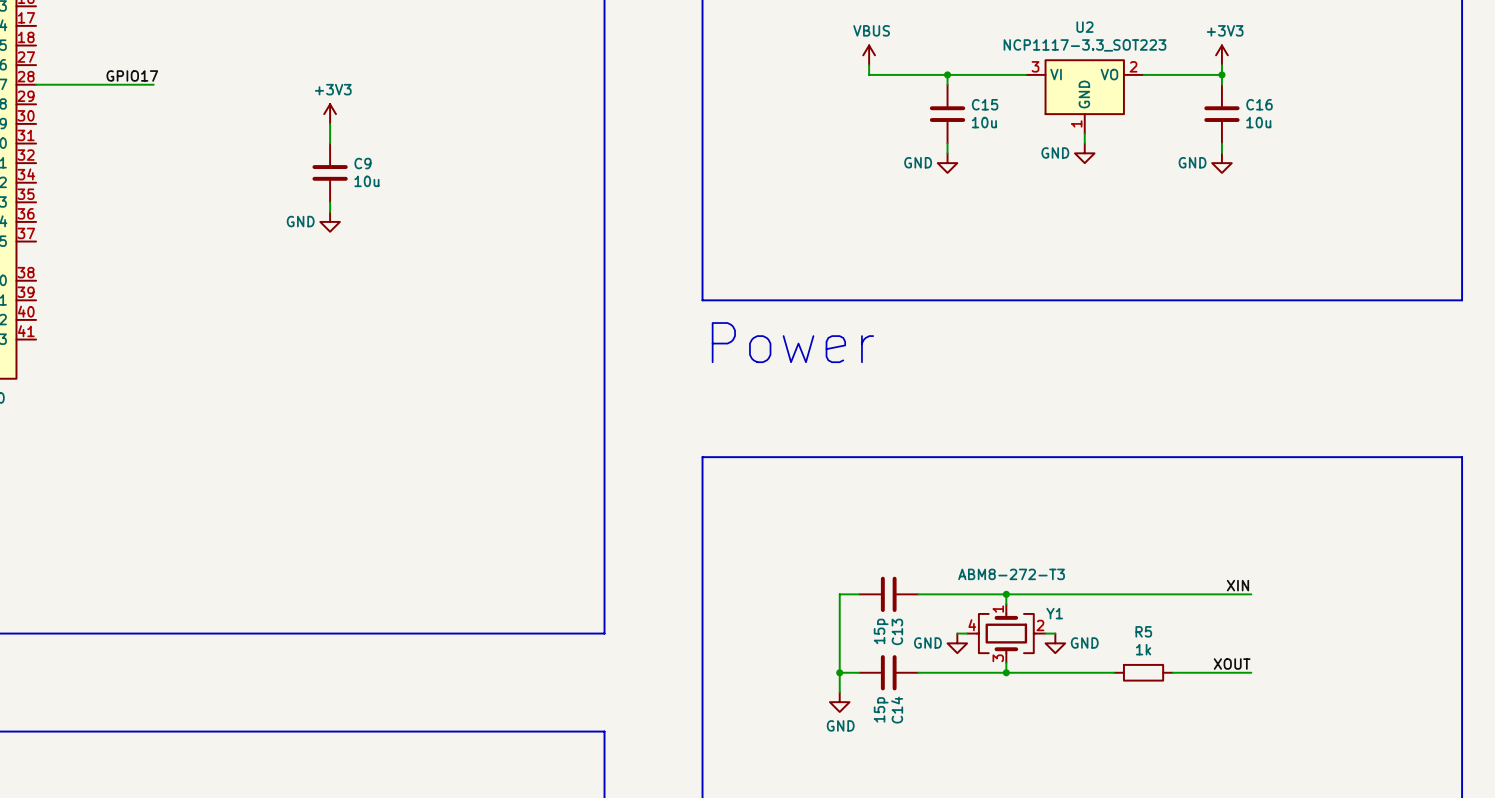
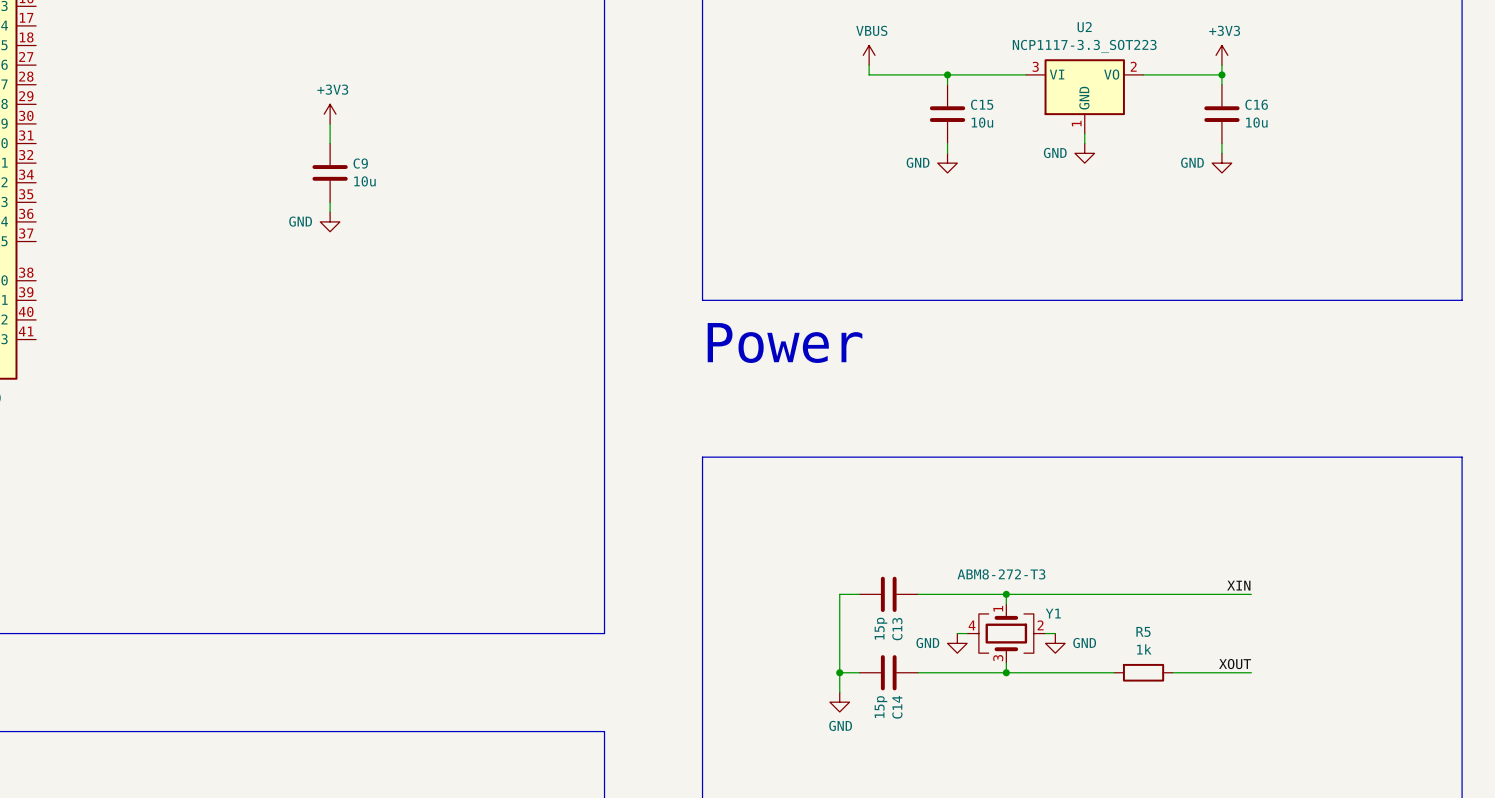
label: GPIO17 (132, 75) -> none
wire: (36, 84) (153, 84) -> none

